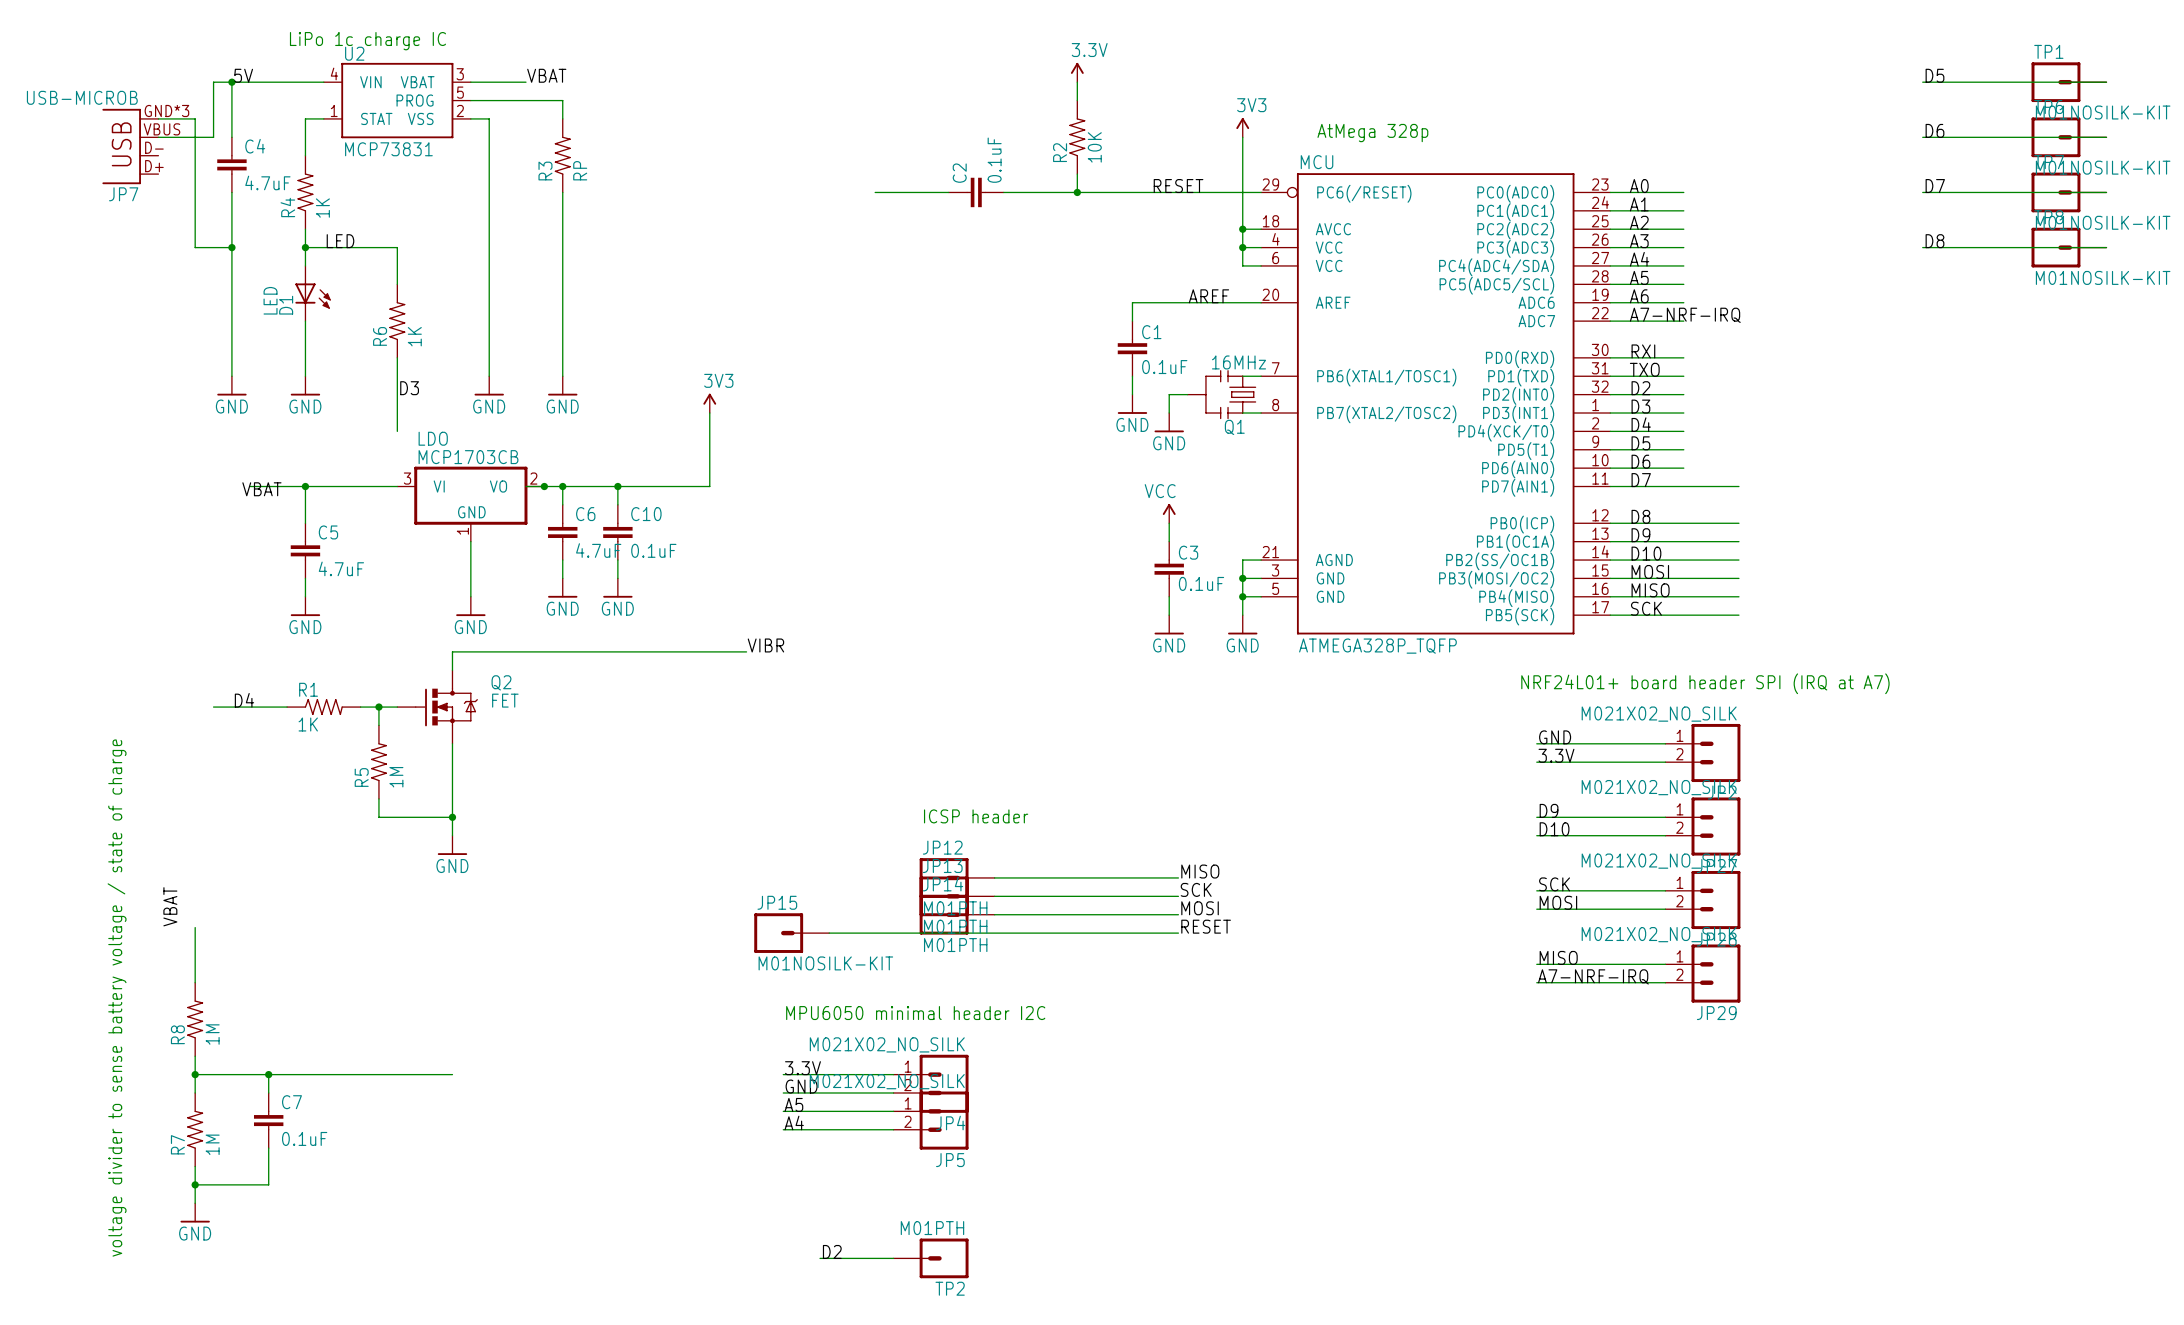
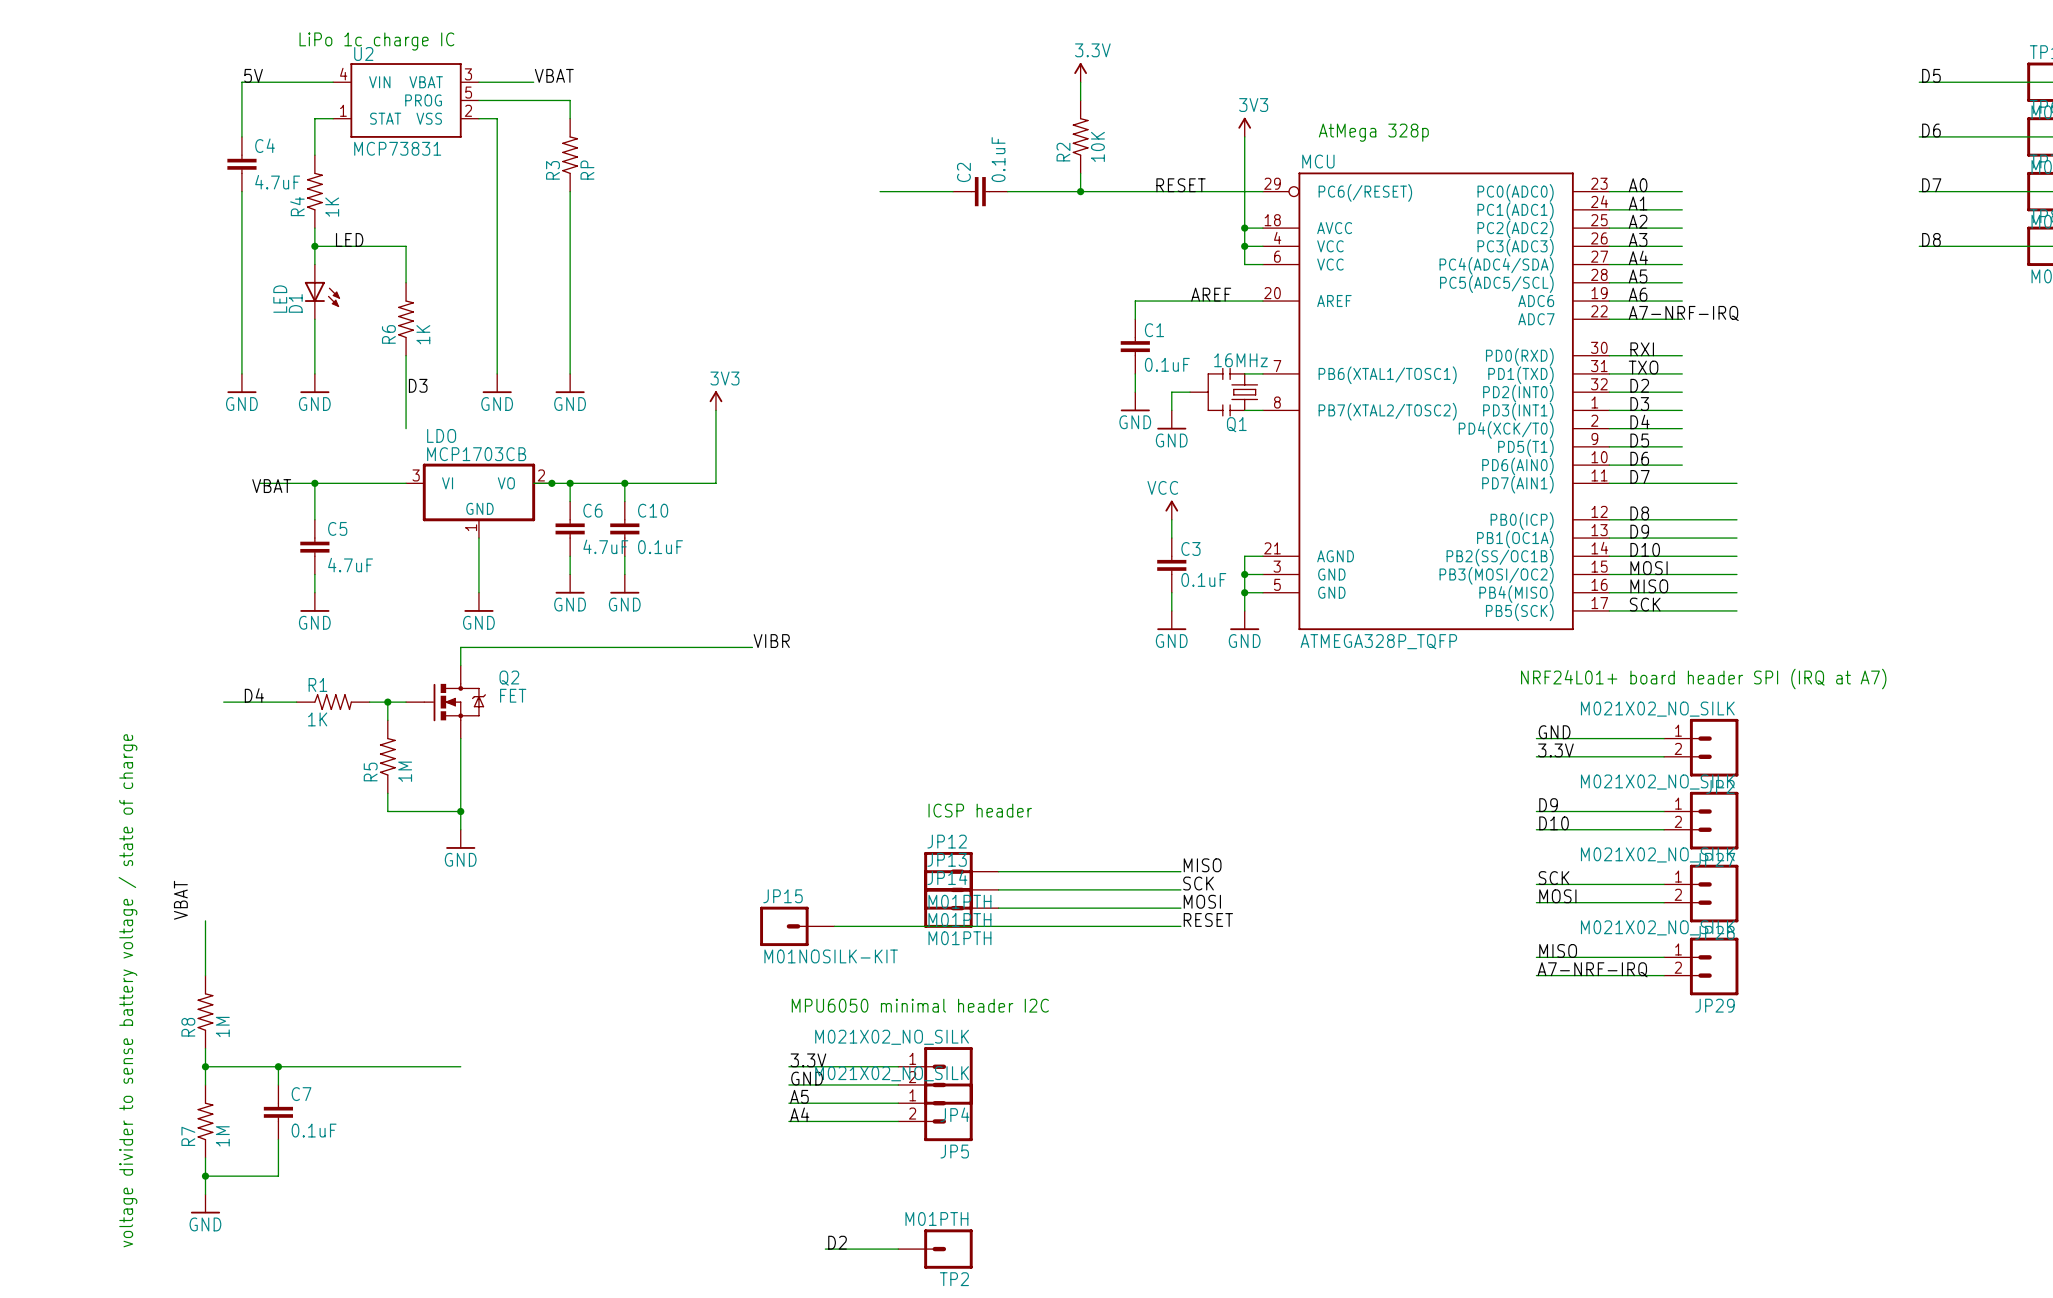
wire: (231, 82) (213, 82) (213, 137) (158, 137) -> none
junction: (231, 82) -> none
wire: (158, 118) (195, 118) (195, 247) (231, 247) -> none
JP7: USB-MICROB (130, 146) -> none
junction: (231, 247) -> none

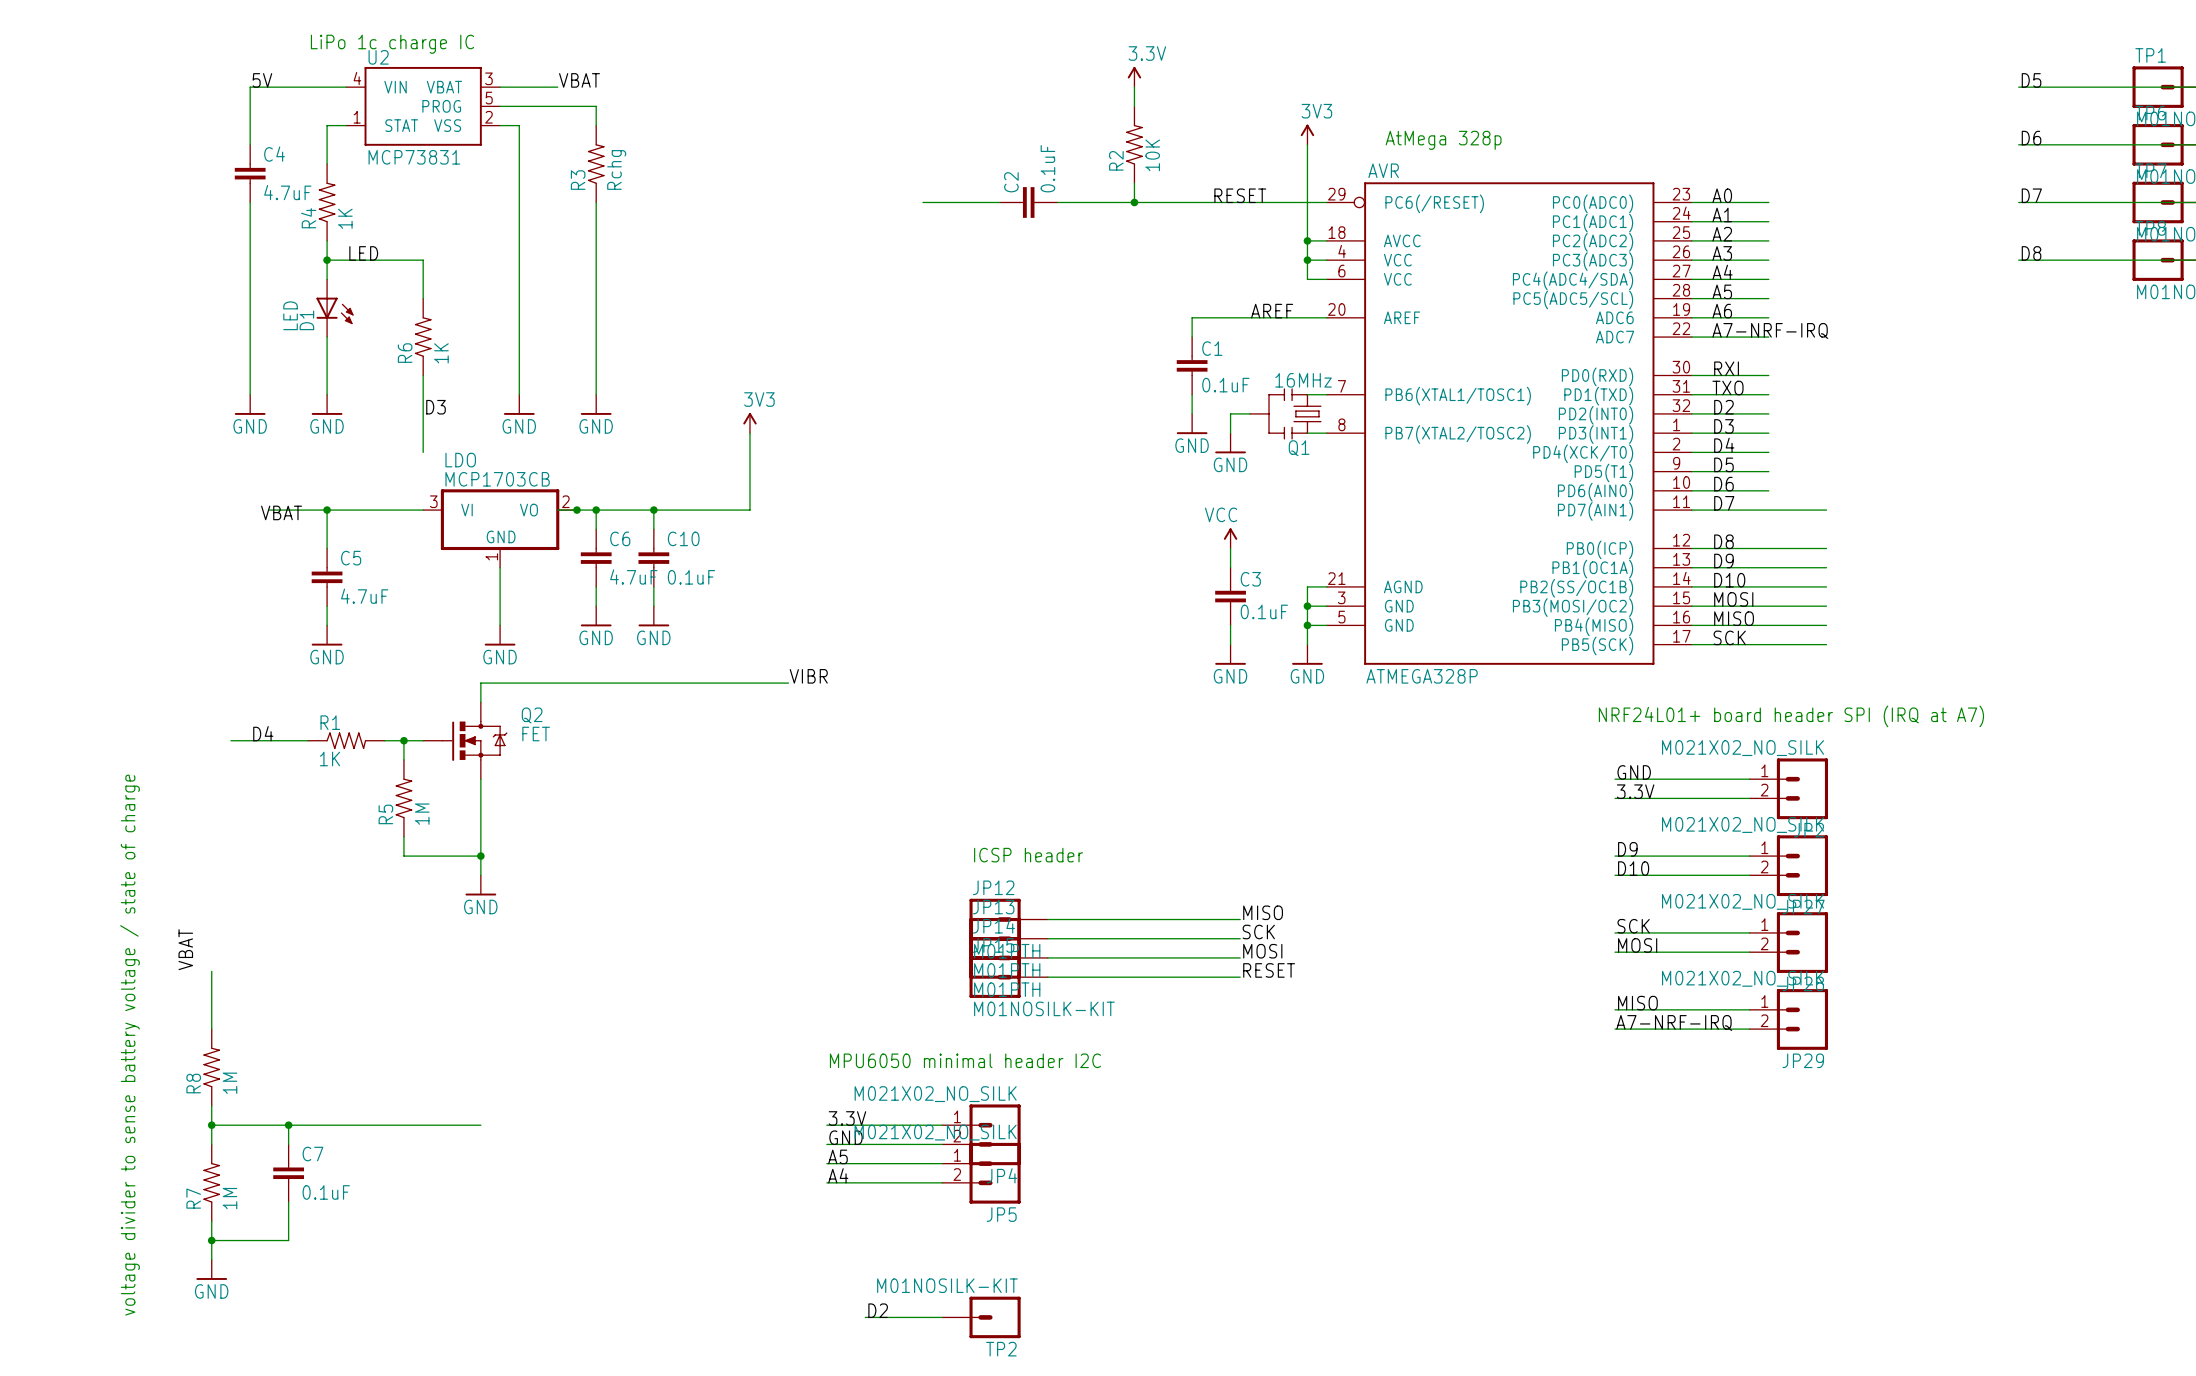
MCU name: MCU (1318, 161) -> AVR (1383, 170)
R3 value: RP (587, 170) -> Rchg (616, 169)
MCU value: ATMEGA328P_TQFP (1378, 641) -> ATMEGA328P (1422, 676)
JP15 position: (797, 926) -> (1008, 977)
wire: (834, 926) (998, 926) -> none
TP2 value: M01PTH (936, 1218) -> M01NOSILK-KIT (947, 1285)

